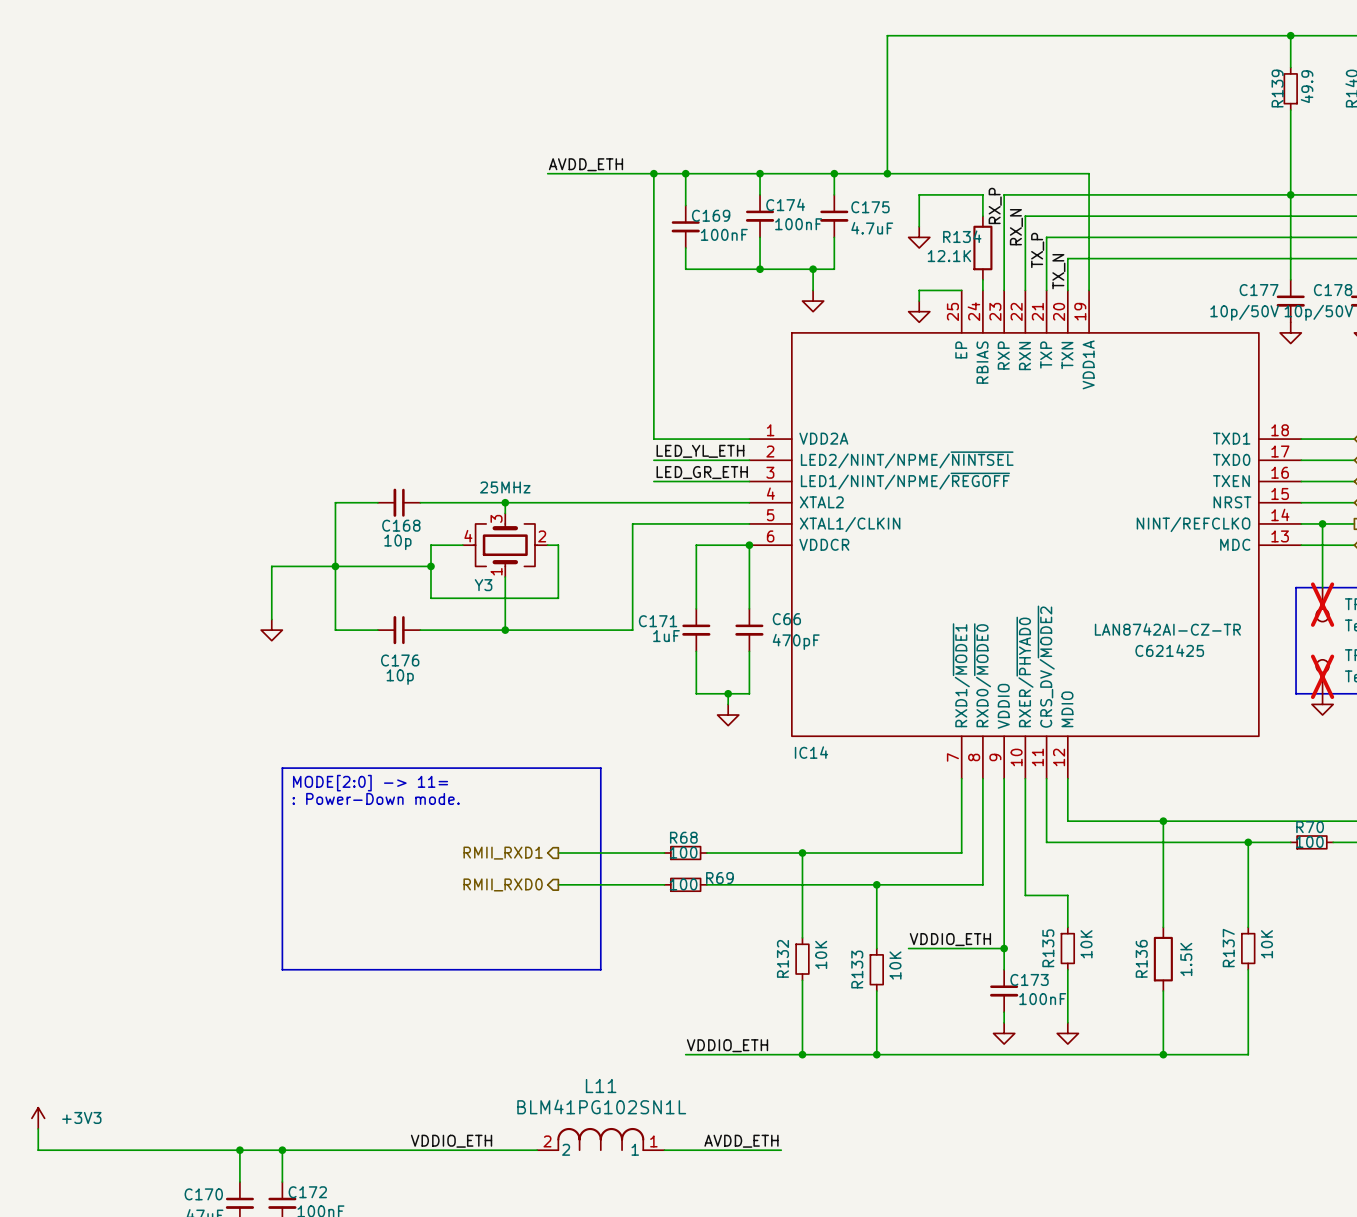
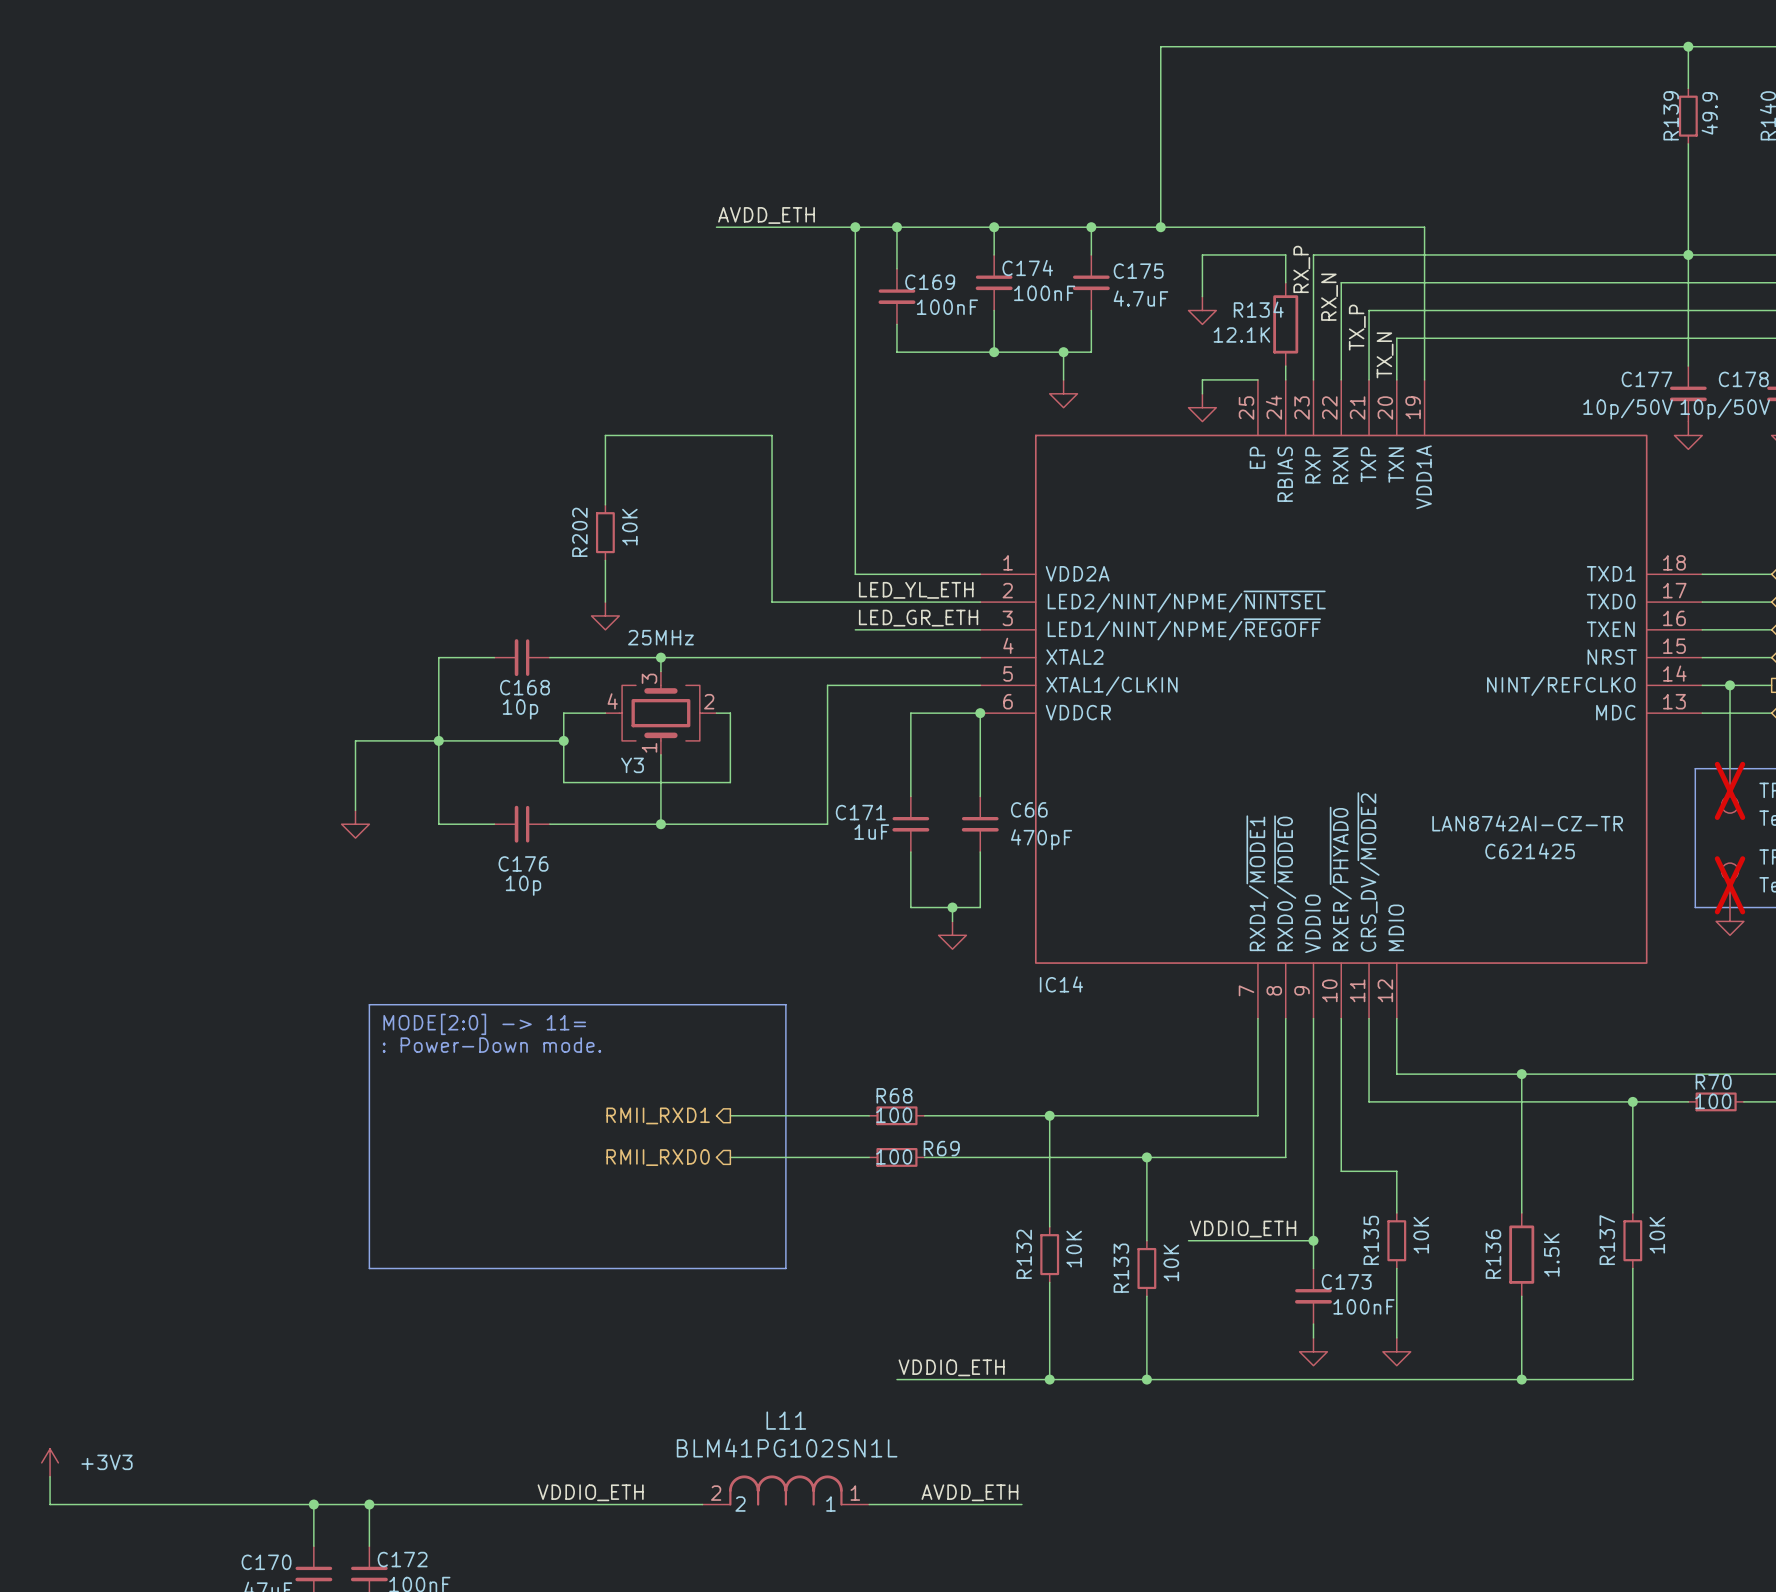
wire: none -> (605, 504) (605, 435) (772, 435) (772, 602) (855, 602)
R202: none -> 10K (605, 532)
wire: none -> (605, 560) (605, 602)
power symbol: none -> (605, 615)

